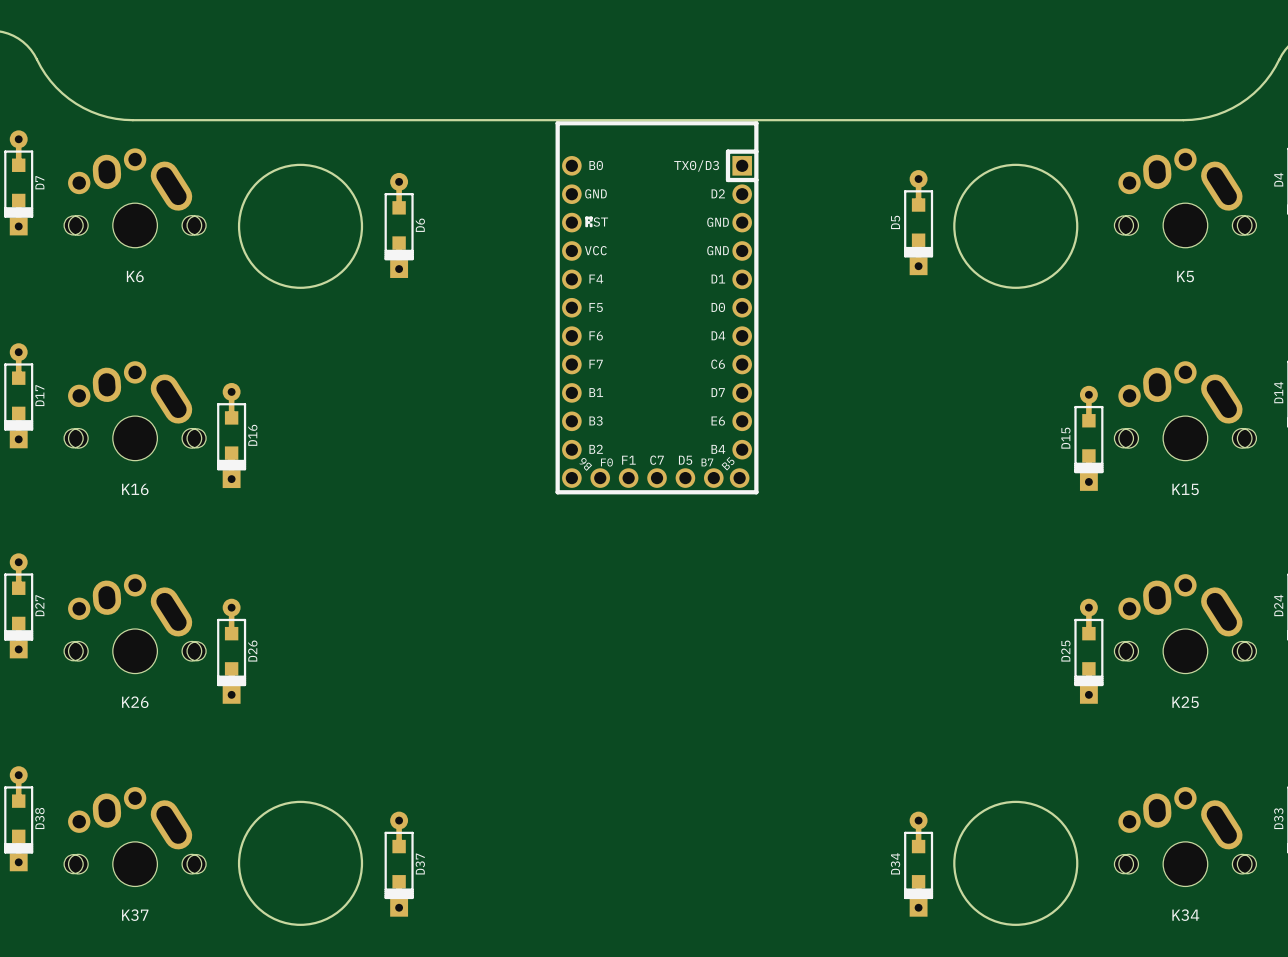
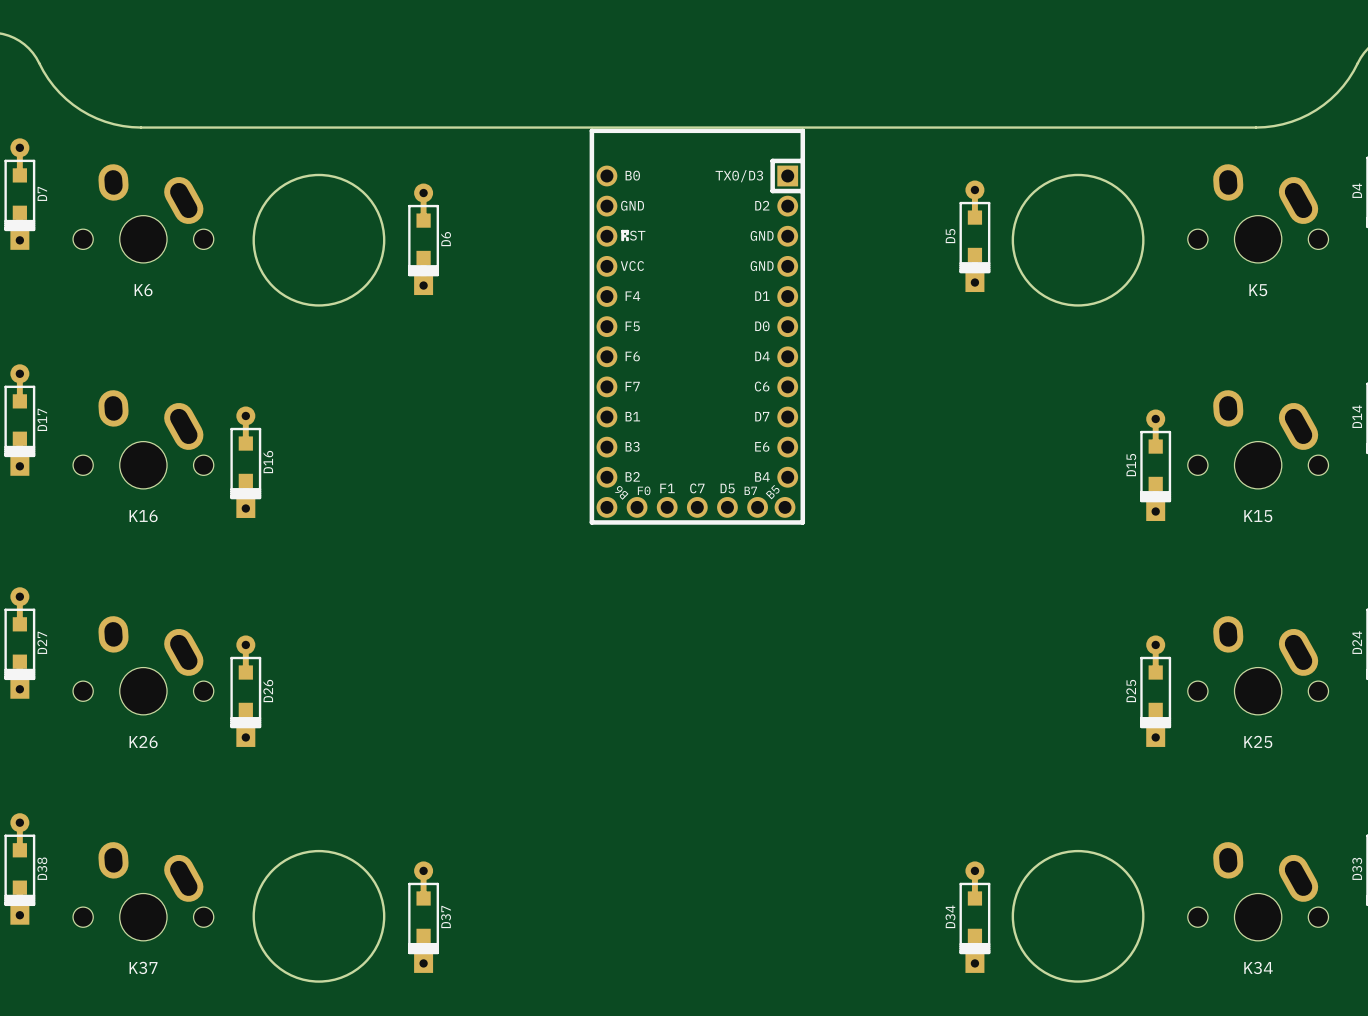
K6 footprint: [64, 148, 207, 248] -> [73, 164, 214, 263]
K5 footprint: [1114, 148, 1257, 248] -> [1187, 164, 1329, 263]
K16 footprint: [64, 361, 207, 461] -> [73, 390, 214, 489]
K15 footprint: [1114, 361, 1257, 461] -> [1187, 390, 1329, 489]
K26 footprint: [64, 574, 207, 674] -> [73, 616, 214, 715]
K25 footprint: [1114, 574, 1257, 674] -> [1187, 616, 1329, 715]
K37 footprint: [64, 787, 207, 887] -> [73, 842, 214, 941]
K34 footprint: [1114, 787, 1257, 887] -> [1187, 842, 1329, 941]

